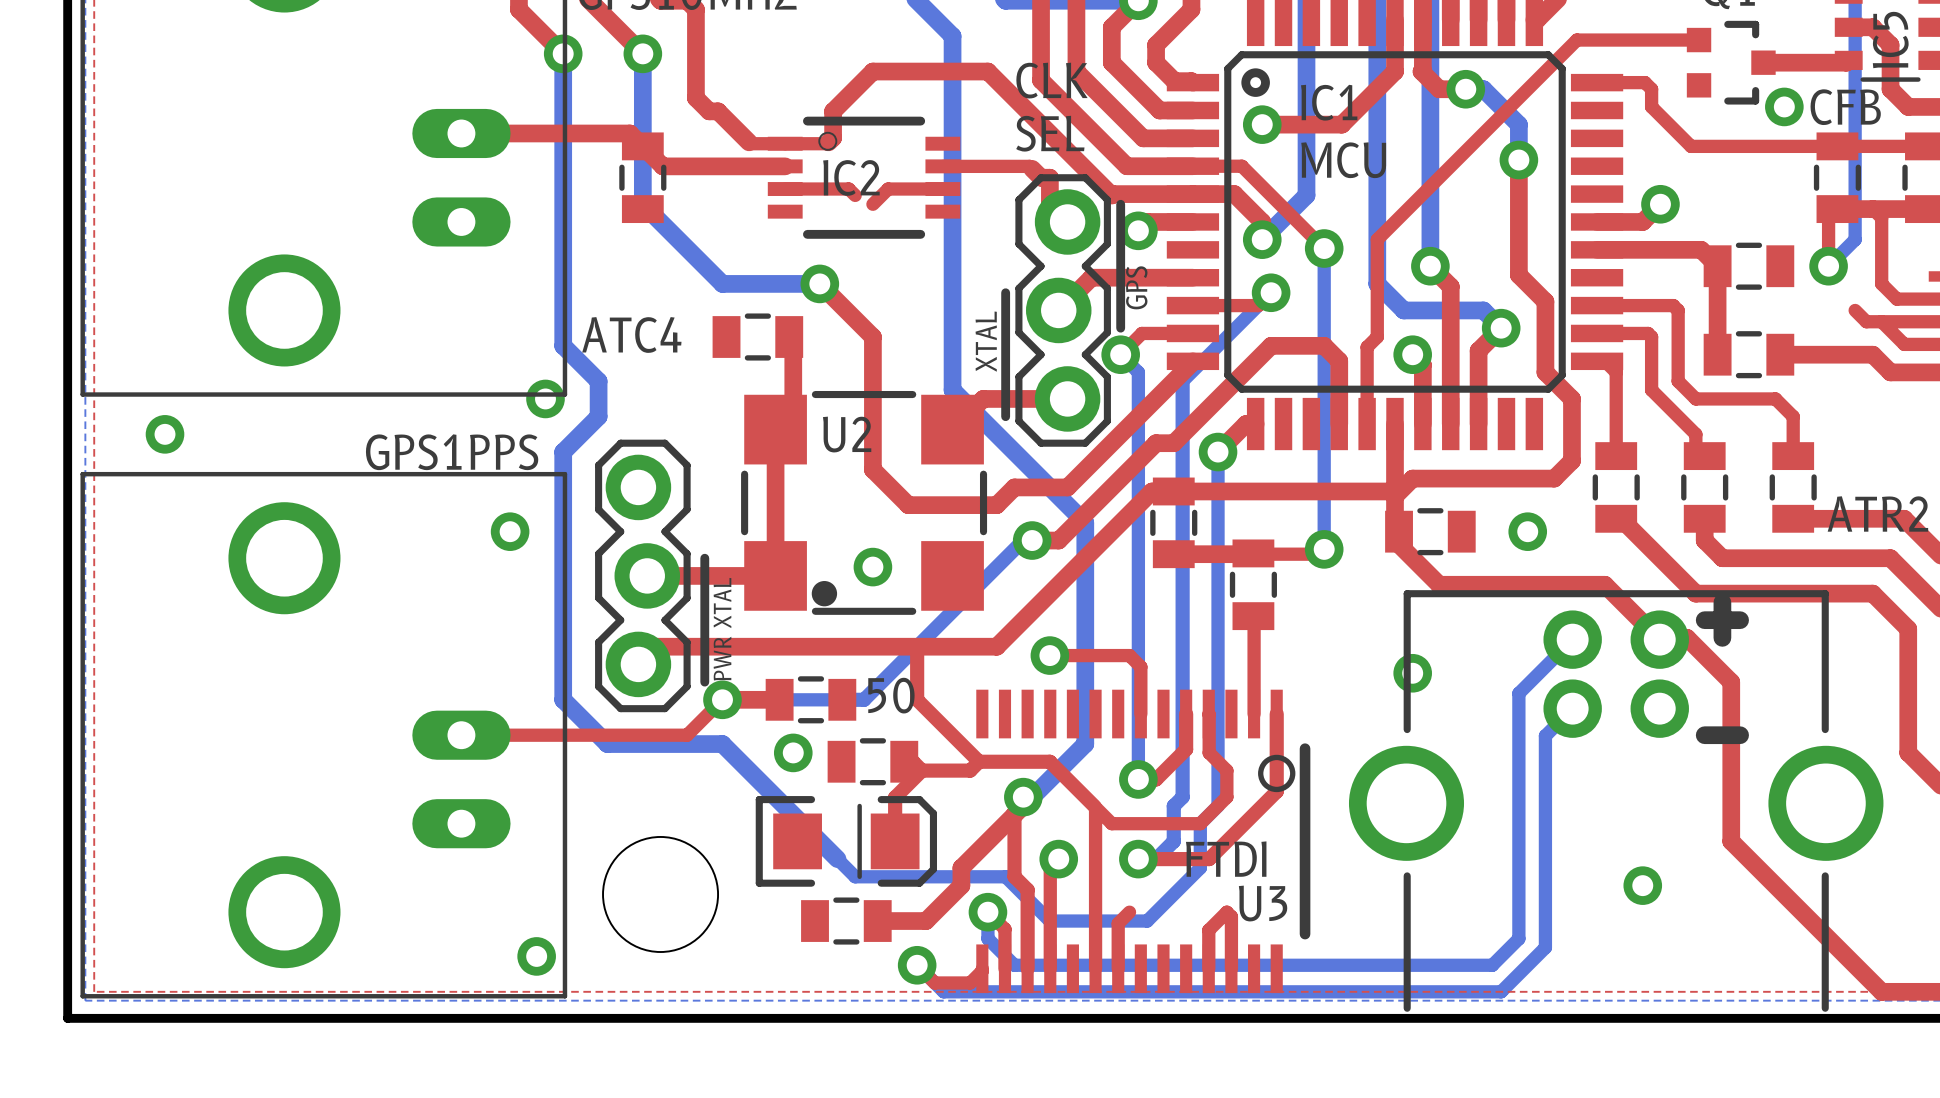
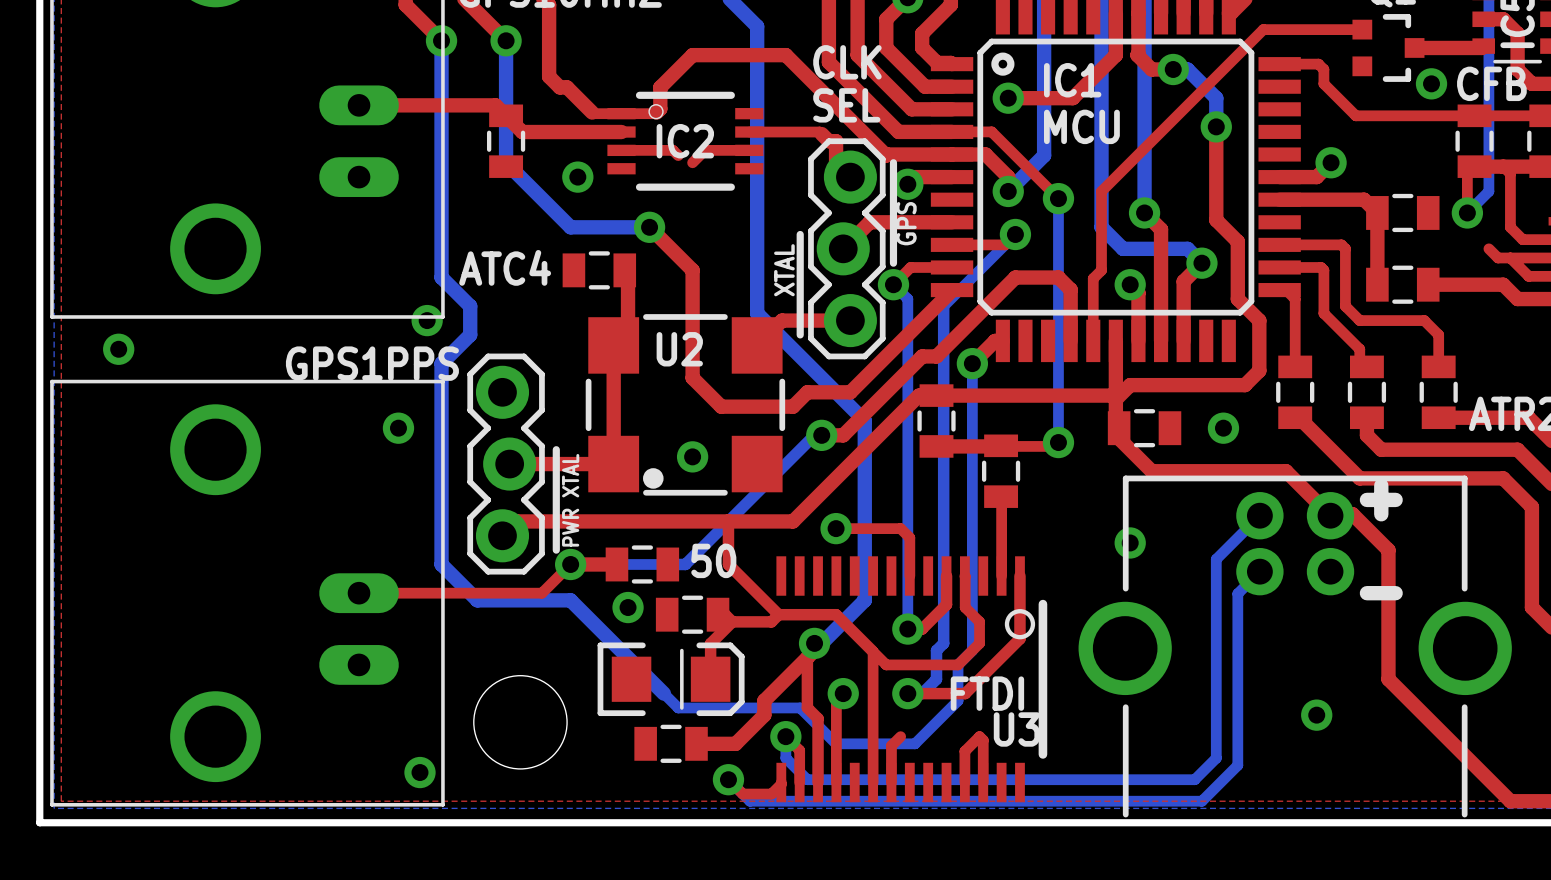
via: none -> (577, 177)

